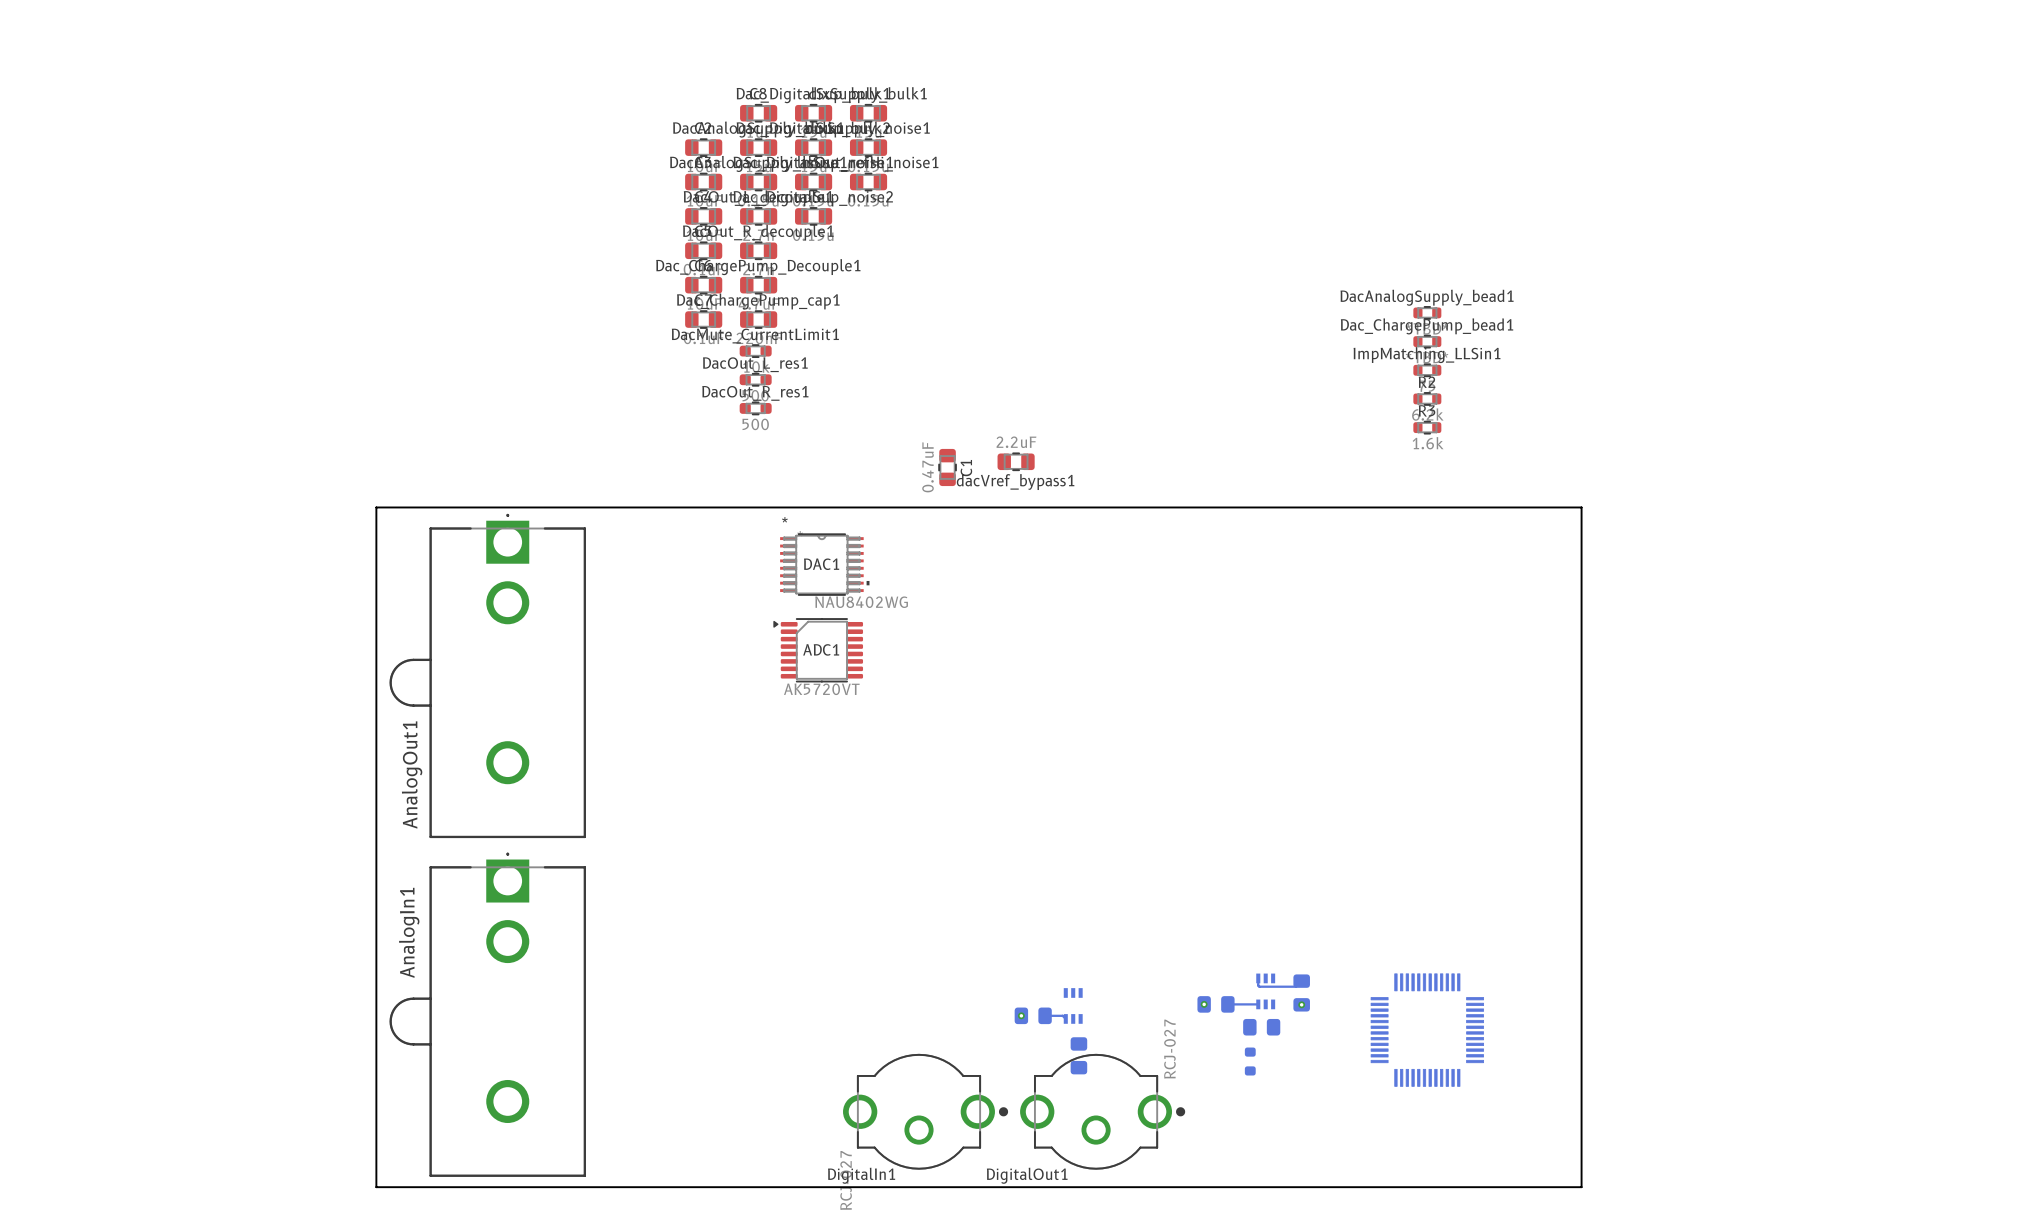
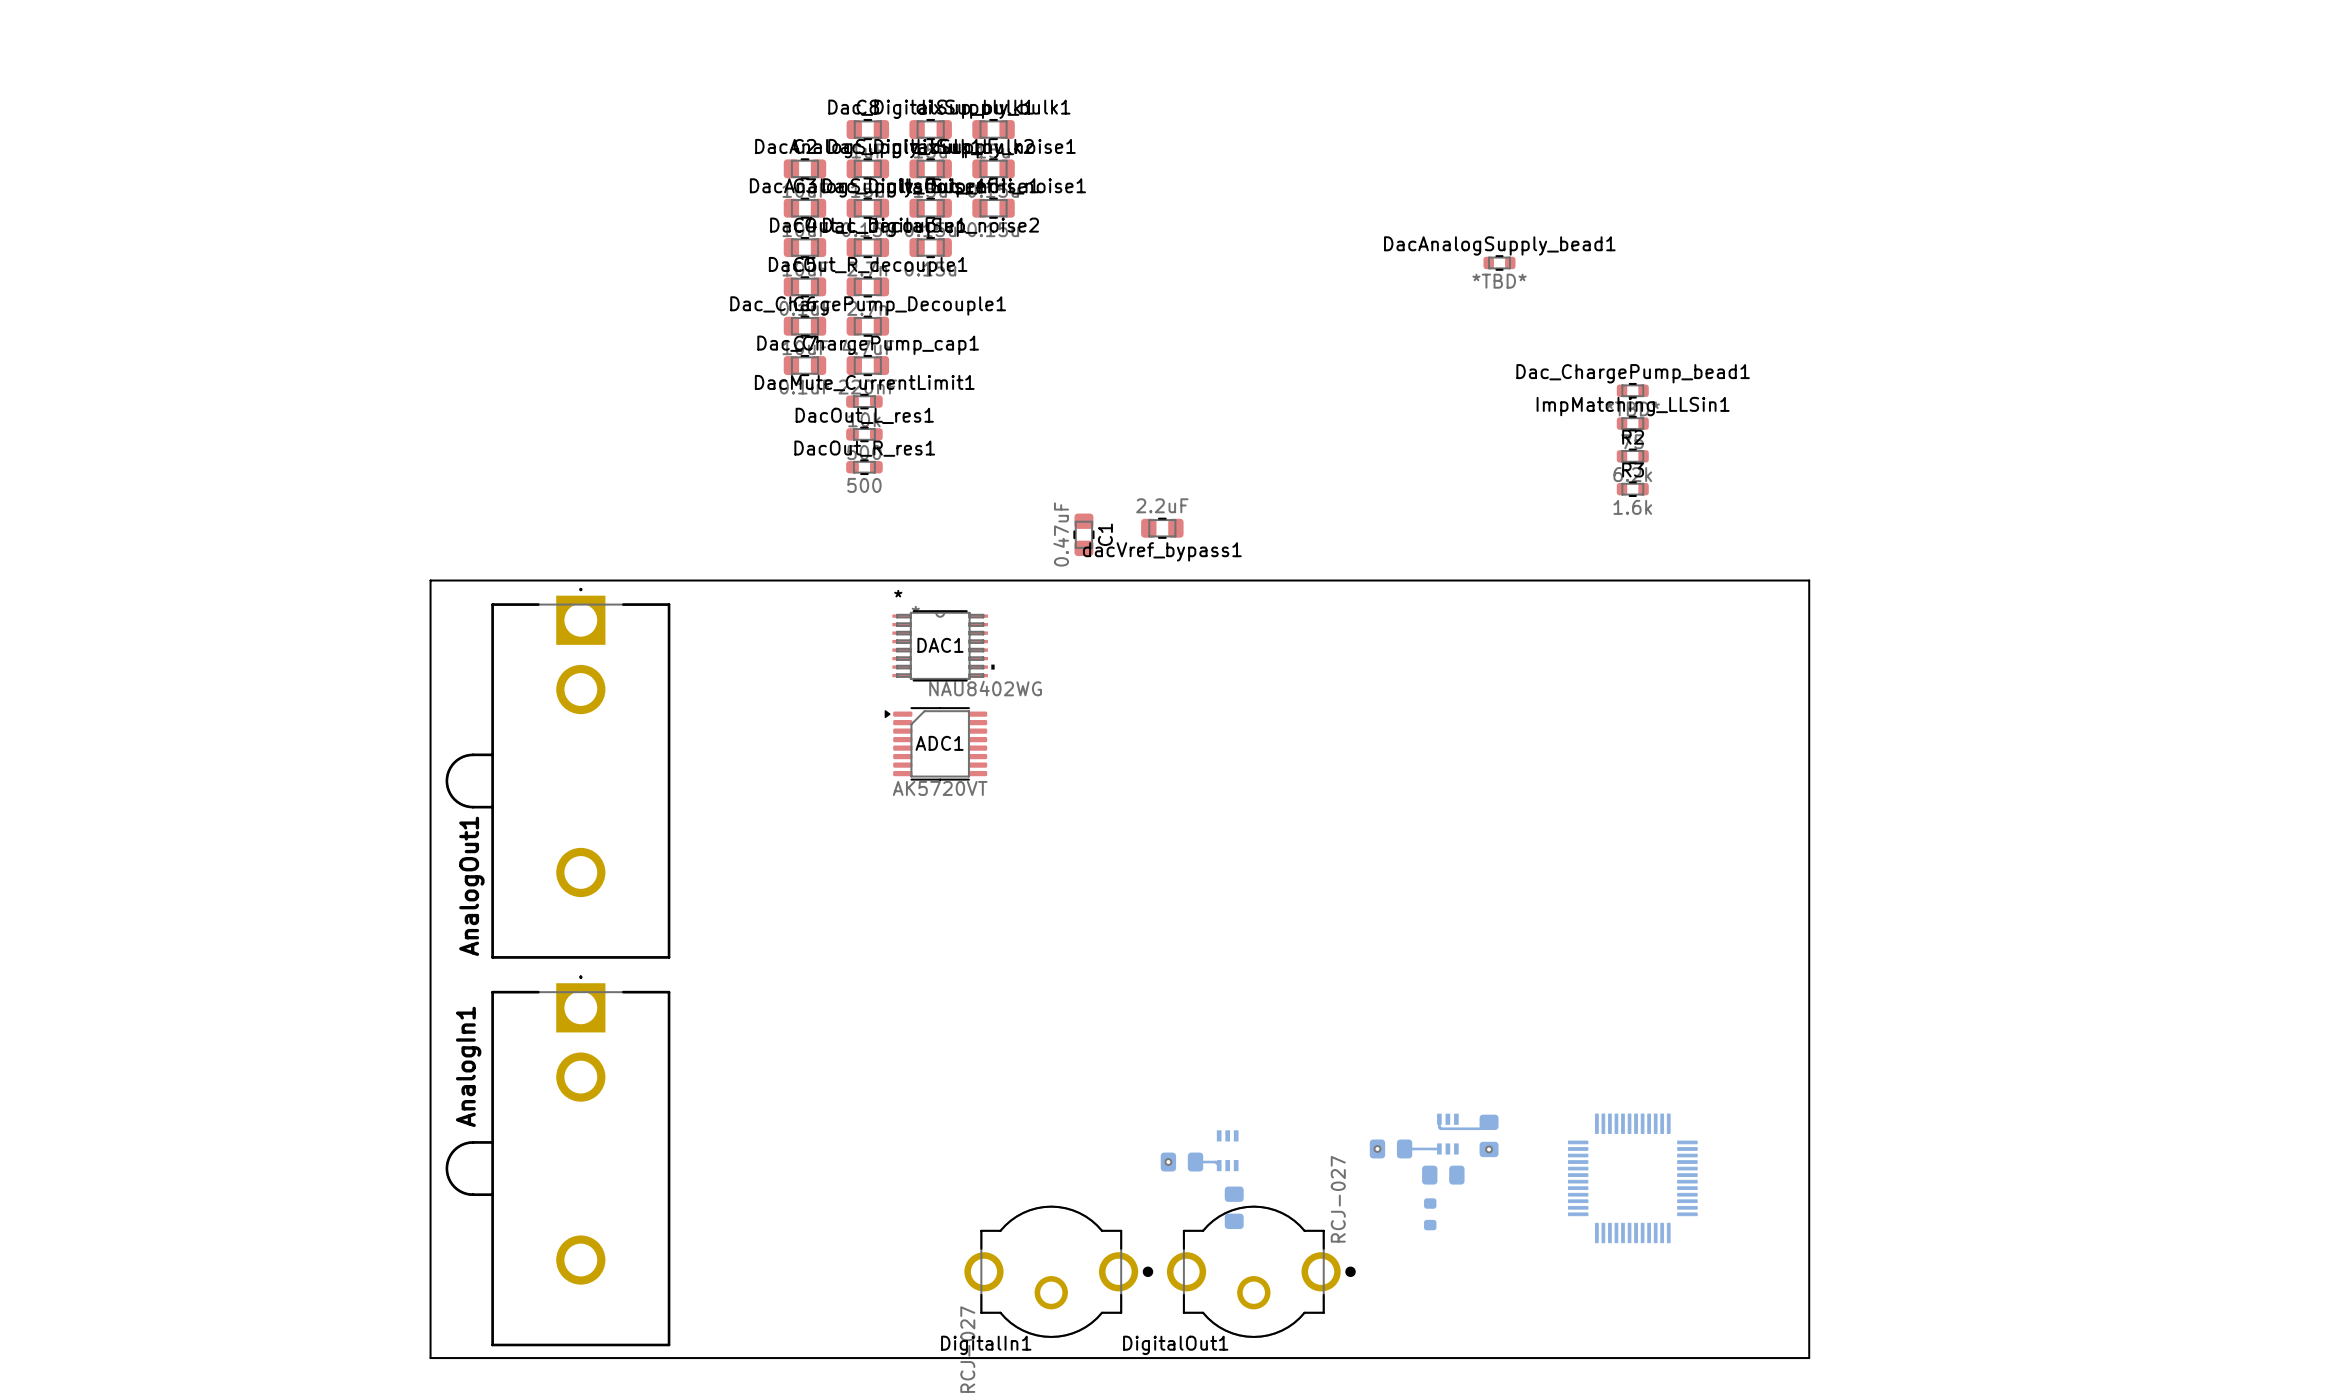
DacAnalogSupply_bead1 position: (1427, 312) -> (1499, 262)

